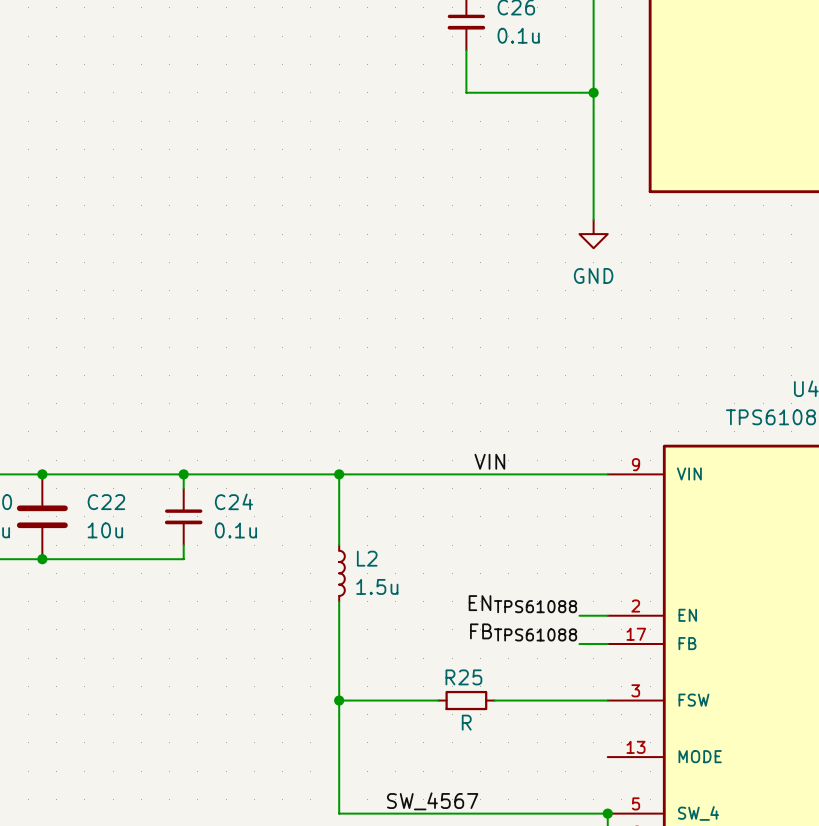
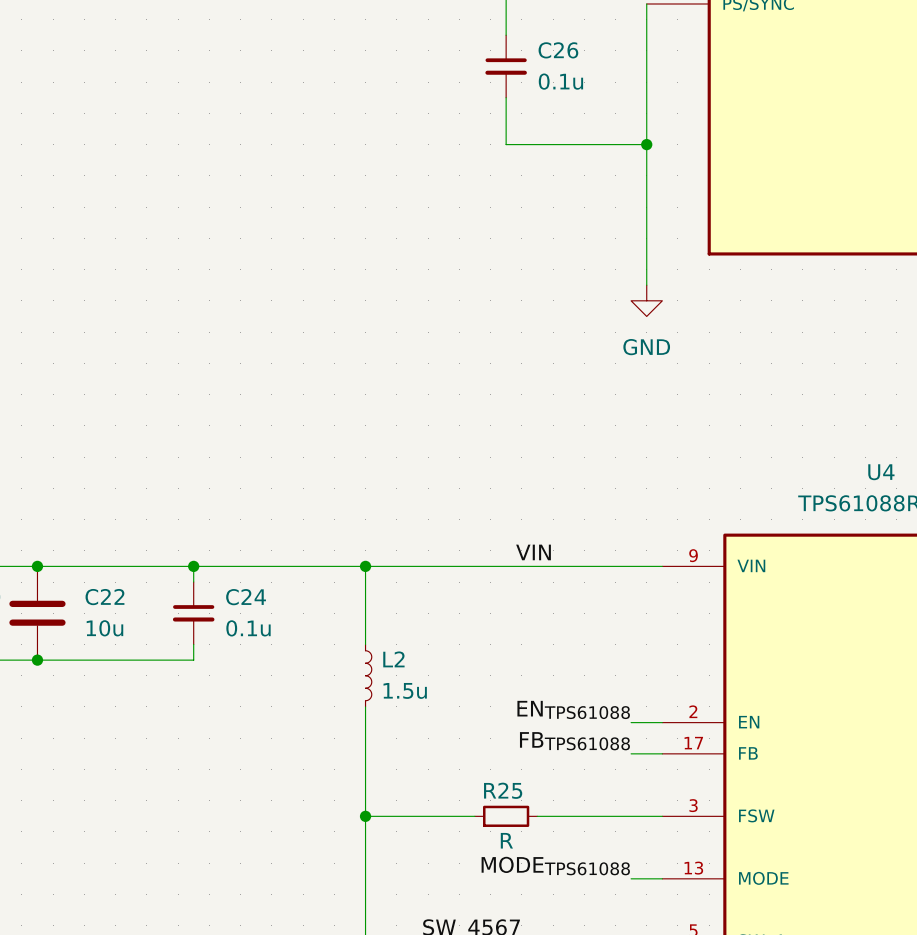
label: none -> MODETPS61088 (555, 866)
wire: none -> (631, 878) (662, 878)

